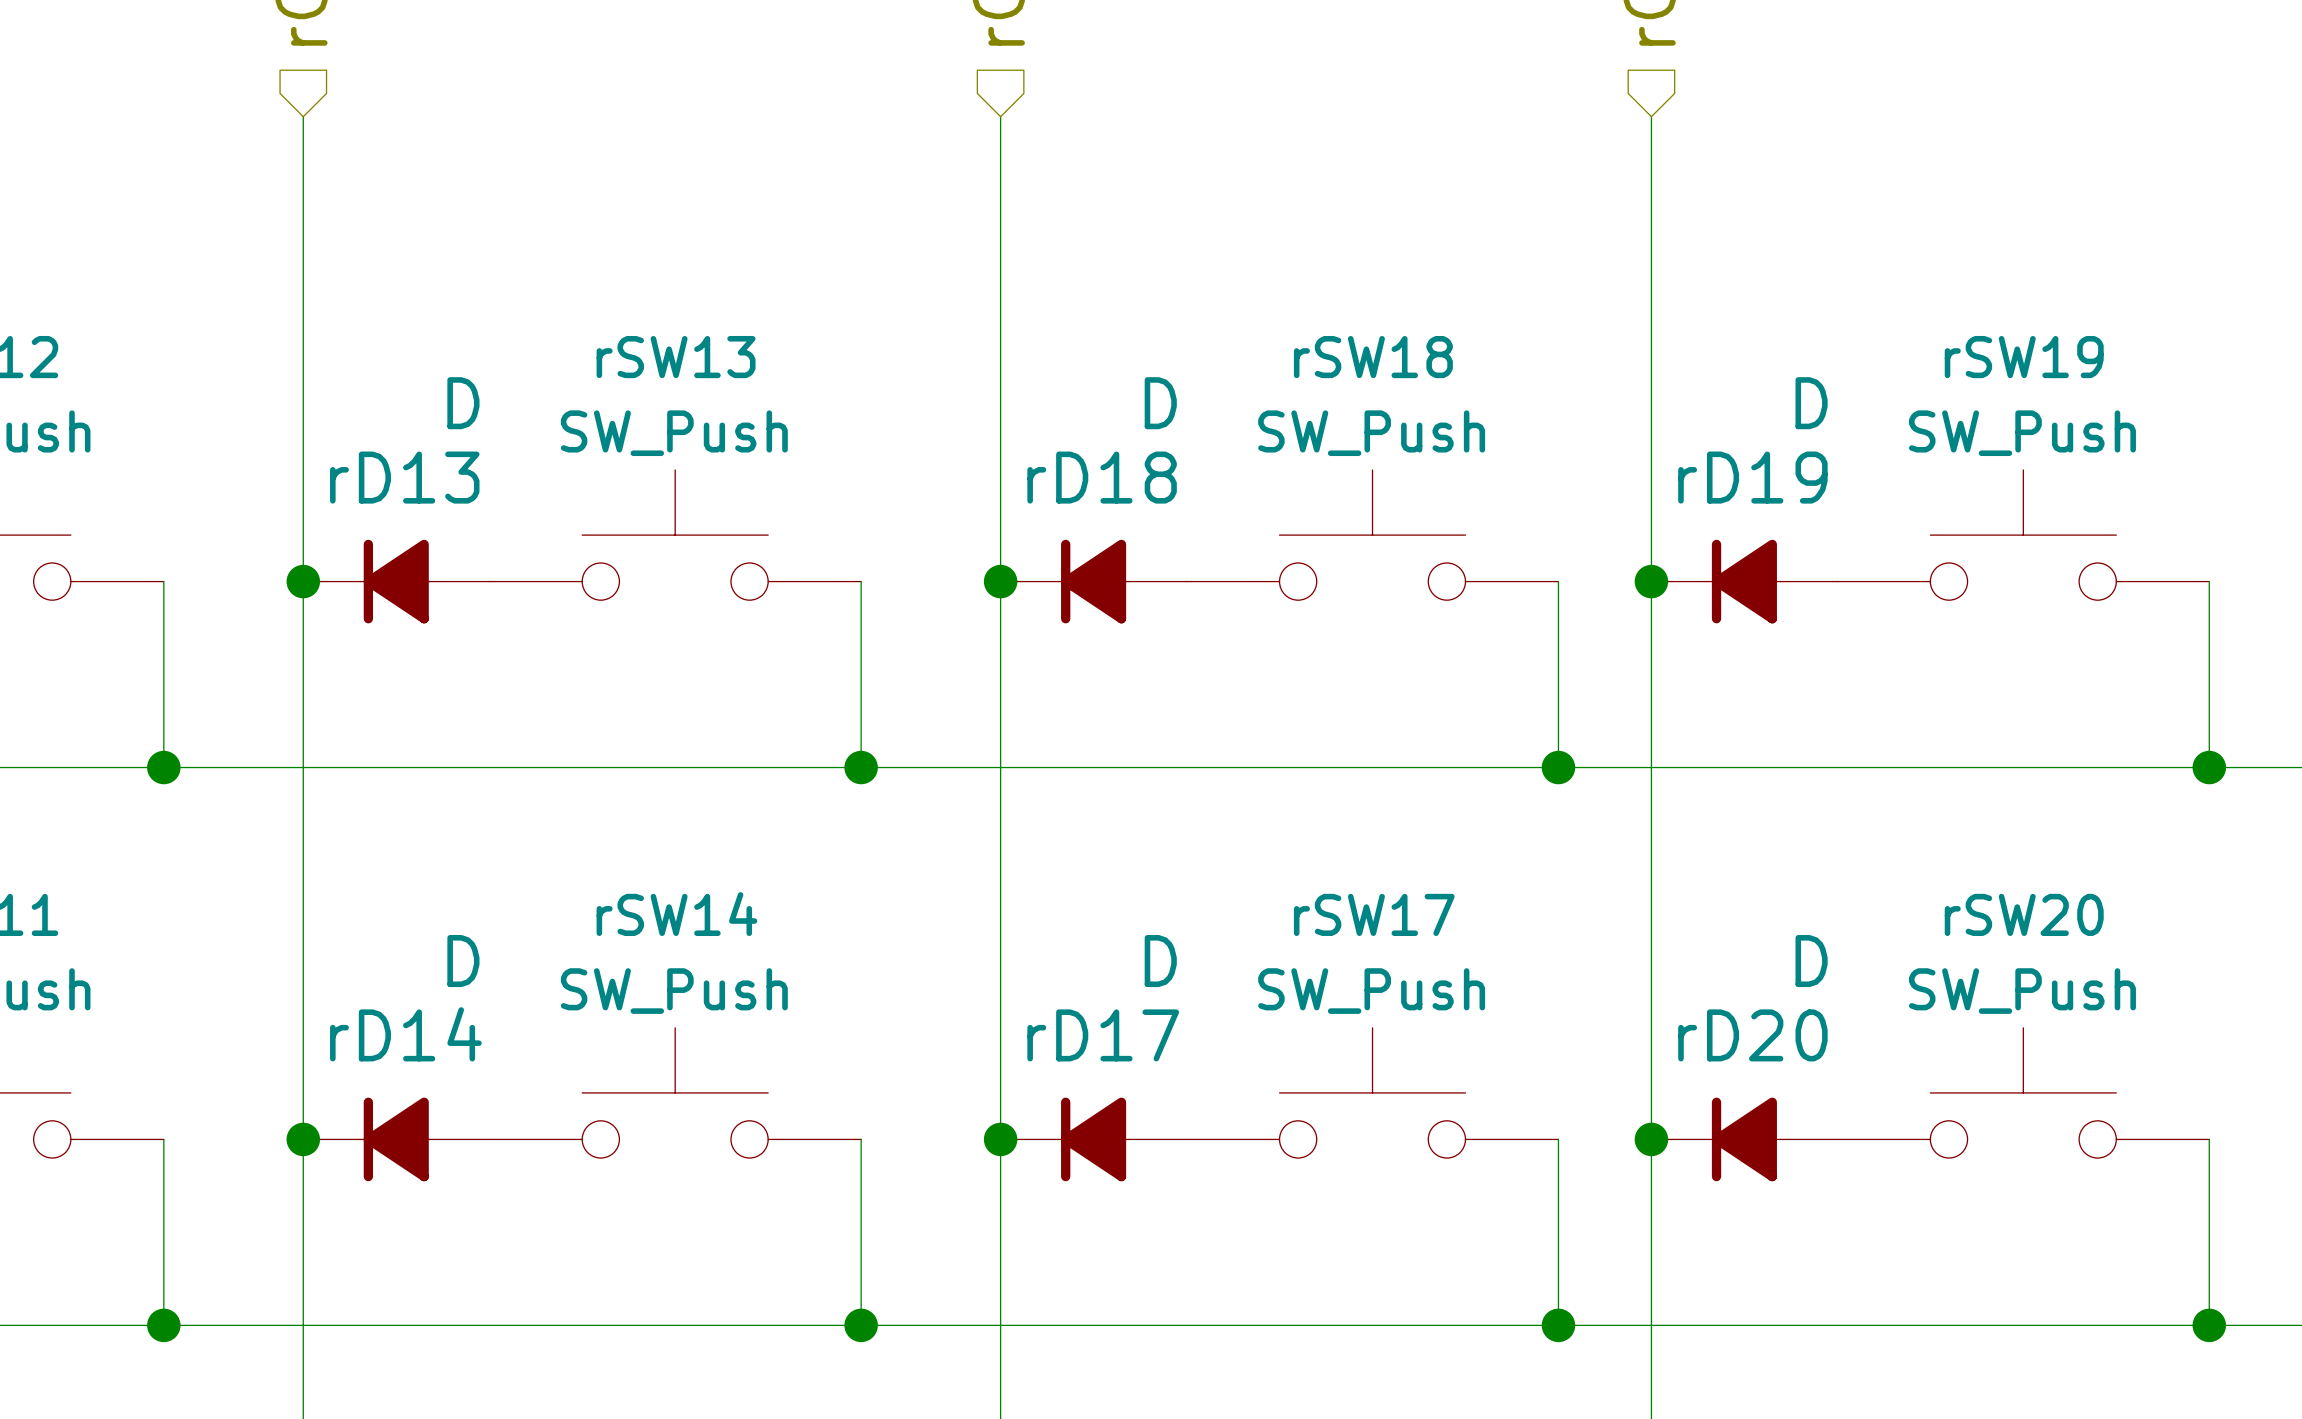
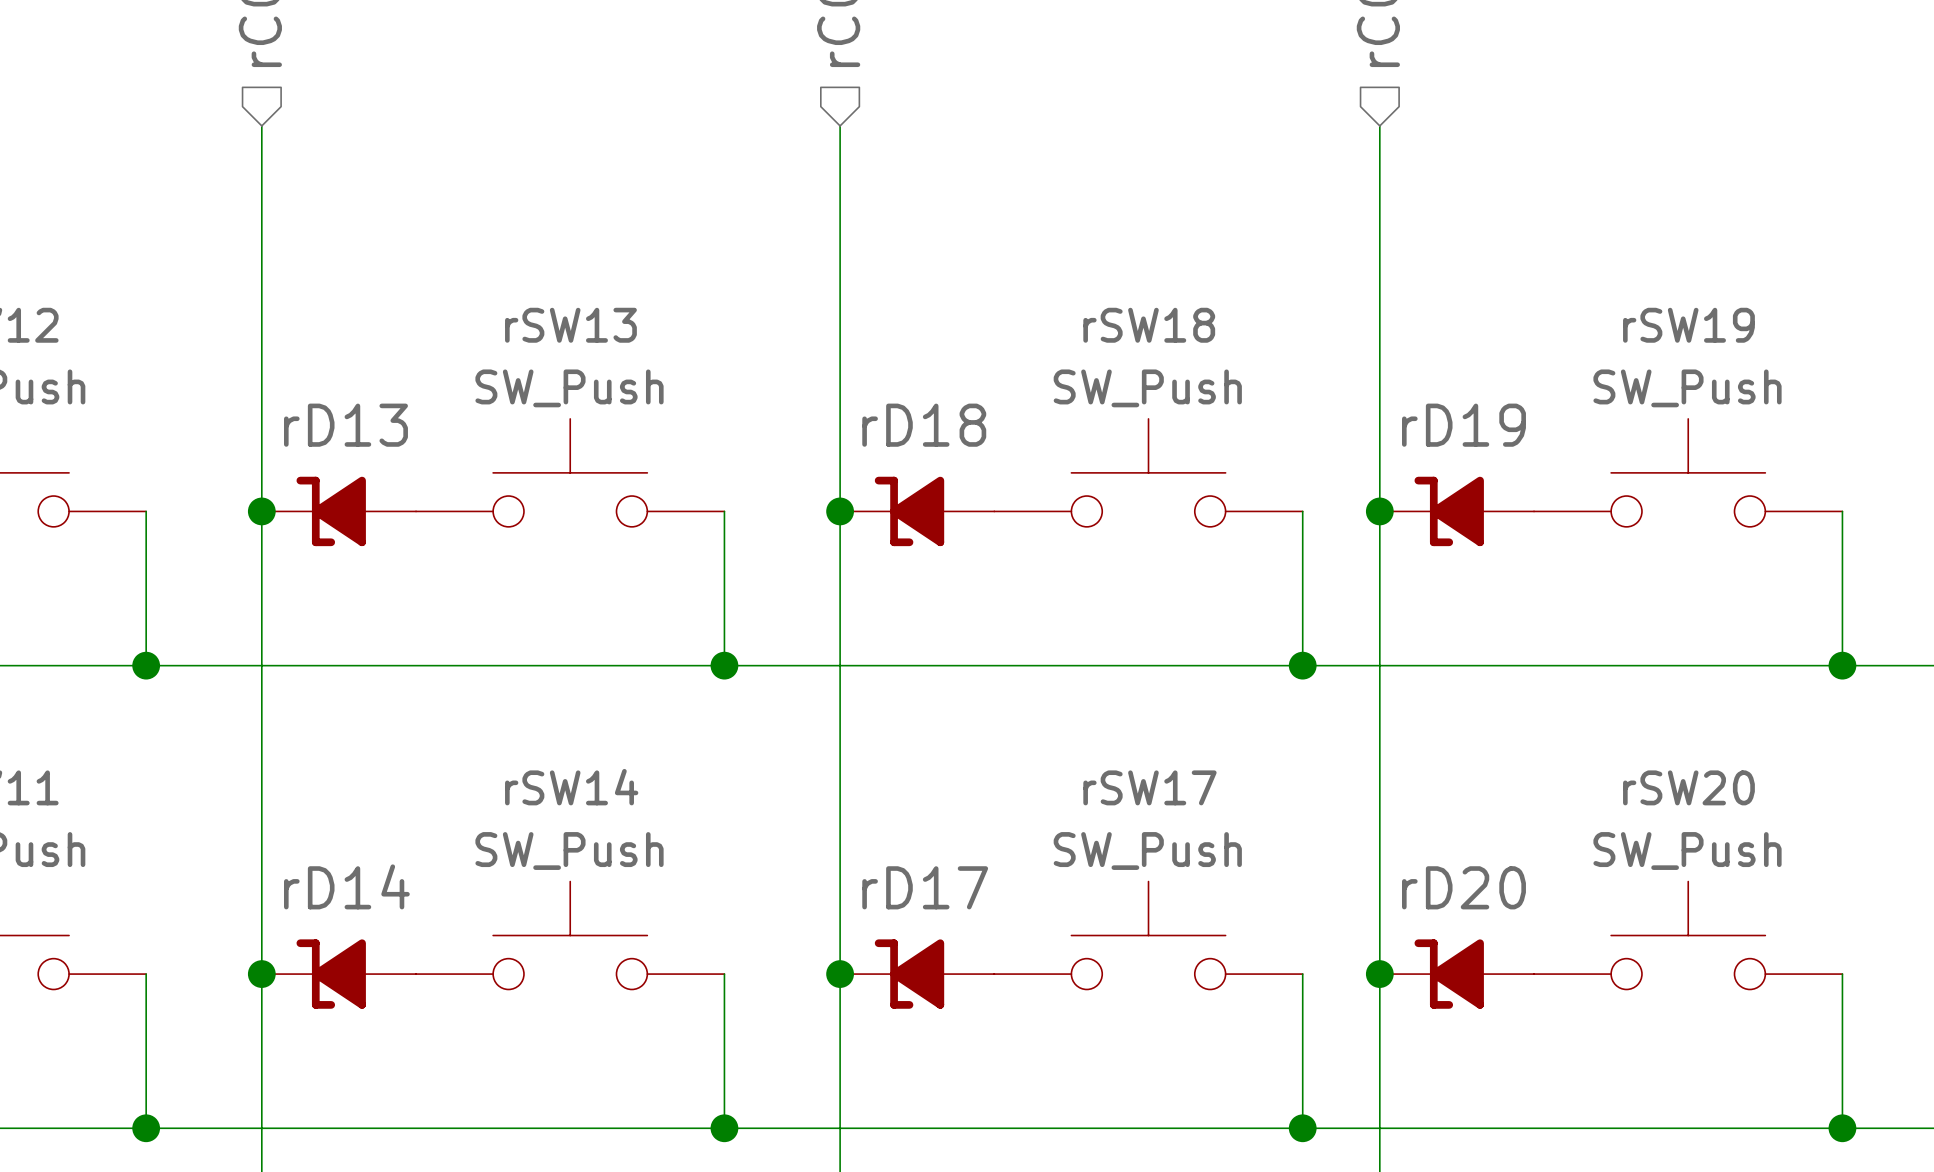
rD13 value: D (463, 403) -> none
rD18 value: D (1160, 403) -> none
rD19 value: D (1811, 403) -> none
rD13 symbol: [303, 539, 490, 624] -> [261, 476, 417, 547]
rD18 symbol: [1000, 539, 1187, 624] -> [840, 476, 995, 547]
rD19 symbol: [1651, 539, 1838, 624] -> [1379, 476, 1535, 547]
rD14 value: D (463, 961) -> none
rD17 value: D (1160, 961) -> none
rD20 value: D (1811, 961) -> none
rD14 symbol: [303, 1097, 490, 1182] -> [261, 939, 417, 1009]
rD17 symbol: [1000, 1097, 1187, 1182] -> [840, 939, 995, 1009]
rD20 symbol: [1651, 1097, 1838, 1182] -> [1379, 939, 1535, 1009]

